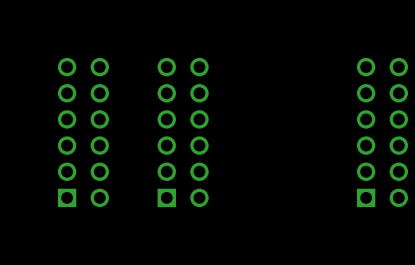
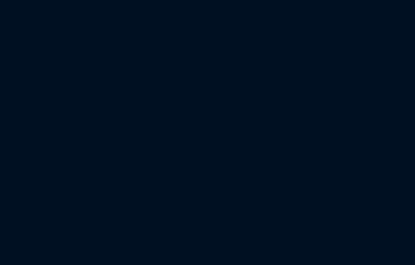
part: (83, 132) -> none
part: (183, 132) -> none
part: (382, 132) -> none

